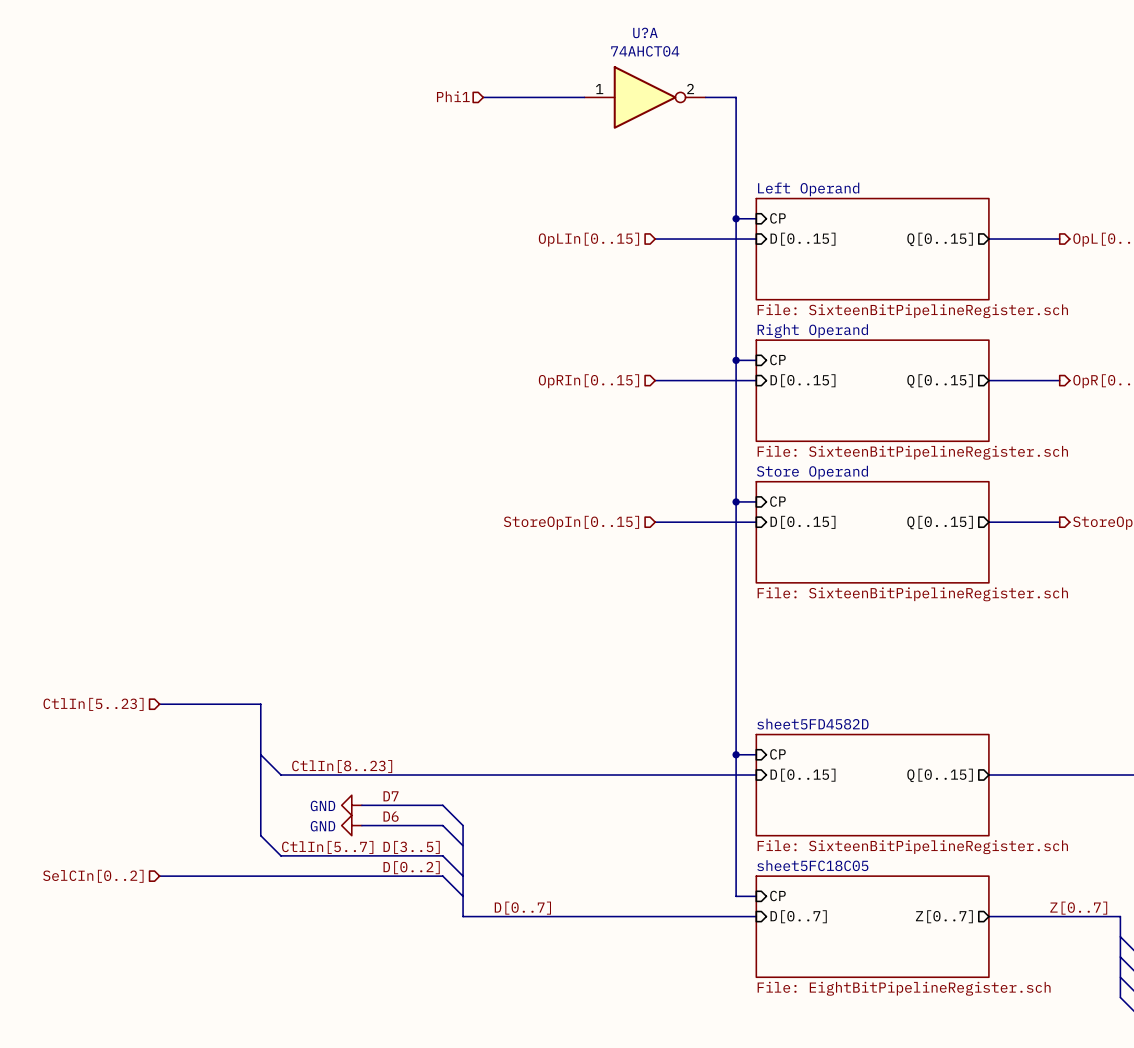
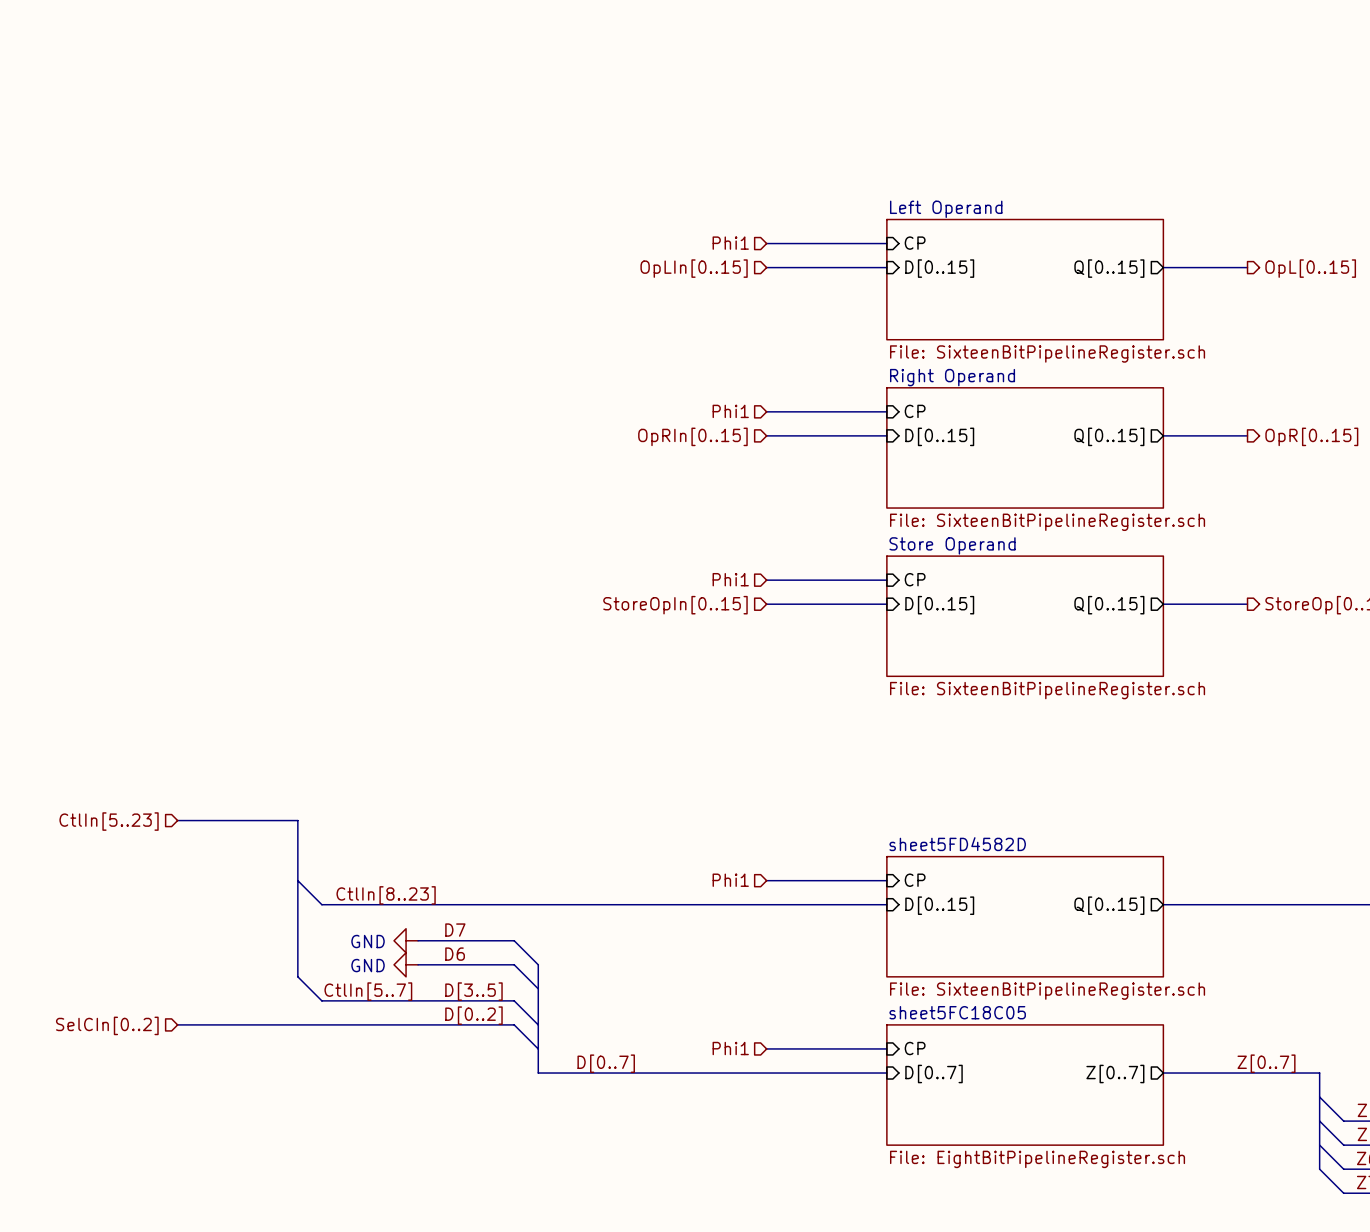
hierarchical label: Phi1 (453, 96) -> none
wire: (483, 97) (584, 97) -> none
U?A: 74AHCT04 (645, 97) -> none
wire: (705, 97) (736, 97) (736, 896) -> (766, 1048) (862, 1048)
hierarchical label: none -> Phi1 (730, 243)
wire: none -> (766, 243) (862, 243)
junction: (736, 218) -> none
hierarchical label: none -> Phi1 (730, 411)
wire: none -> (766, 411) (862, 411)
junction: (736, 360) -> none
hierarchical label: none -> Phi1 (730, 579)
wire: none -> (766, 580) (862, 580)
junction: (736, 501) -> none
hierarchical label: none -> Phi1 (730, 880)
wire: none -> (766, 880) (862, 880)
junction: (736, 754) -> none
hierarchical label: none -> Phi1 (730, 1048)

